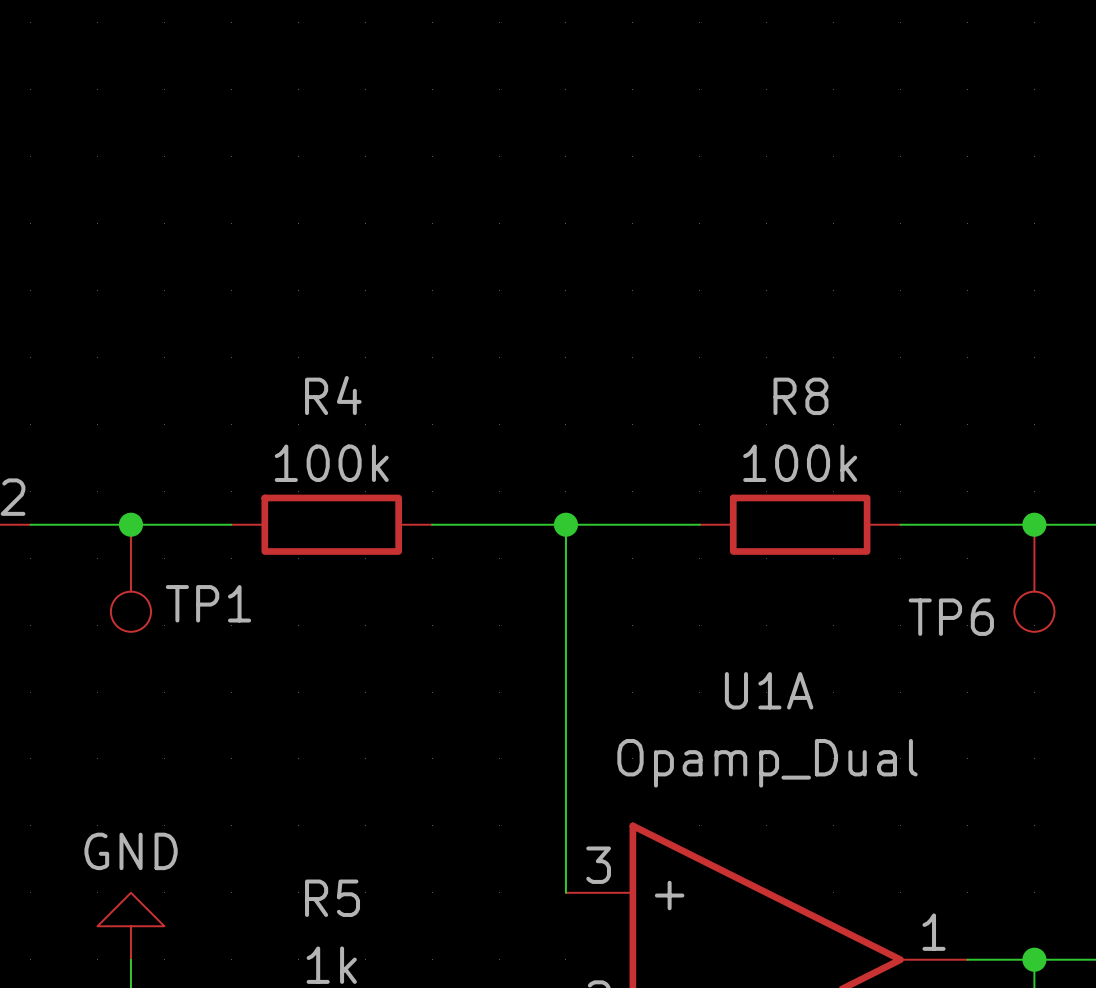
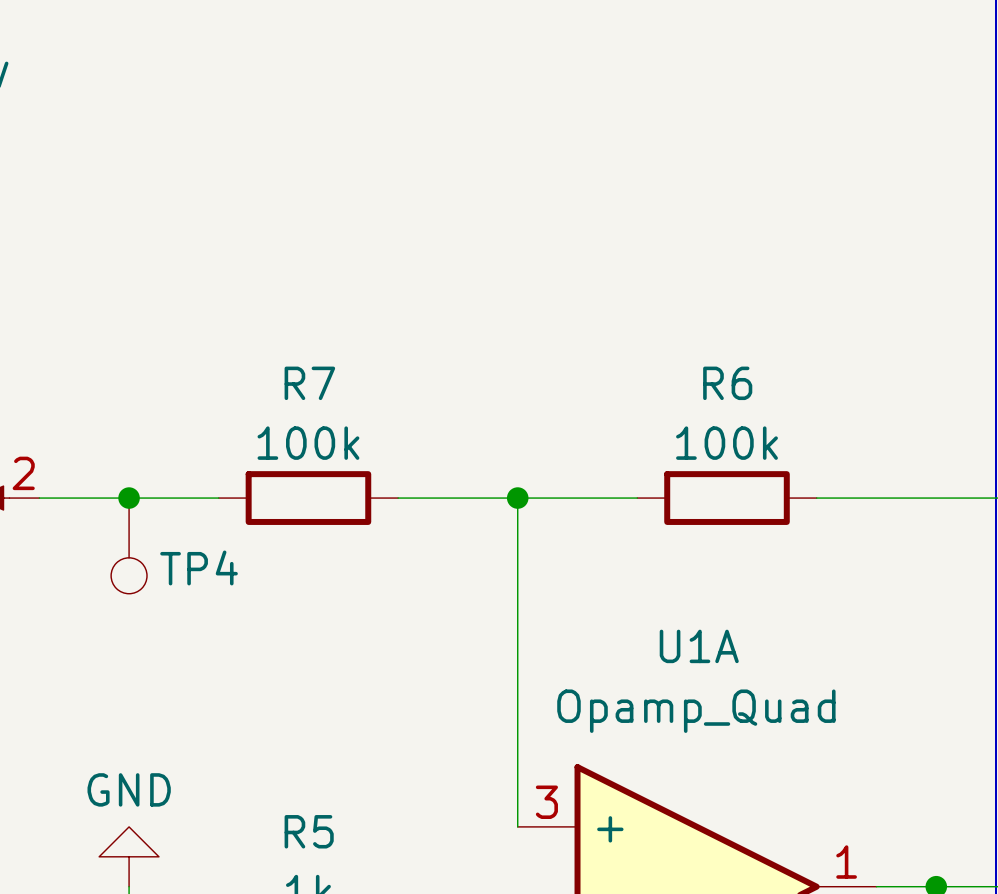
R4 name: R4 (333, 395) -> R7 (309, 383)
R8 name: R8 (800, 396) -> R6 (727, 383)
junction: (1034, 524) -> none
TP6: (1034, 578) -> none
TP1 name: TP1 (208, 603) -> TP4 (199, 567)
U1A value: Opamp_Dual (767, 763) -> Opamp_Quad (696, 711)

